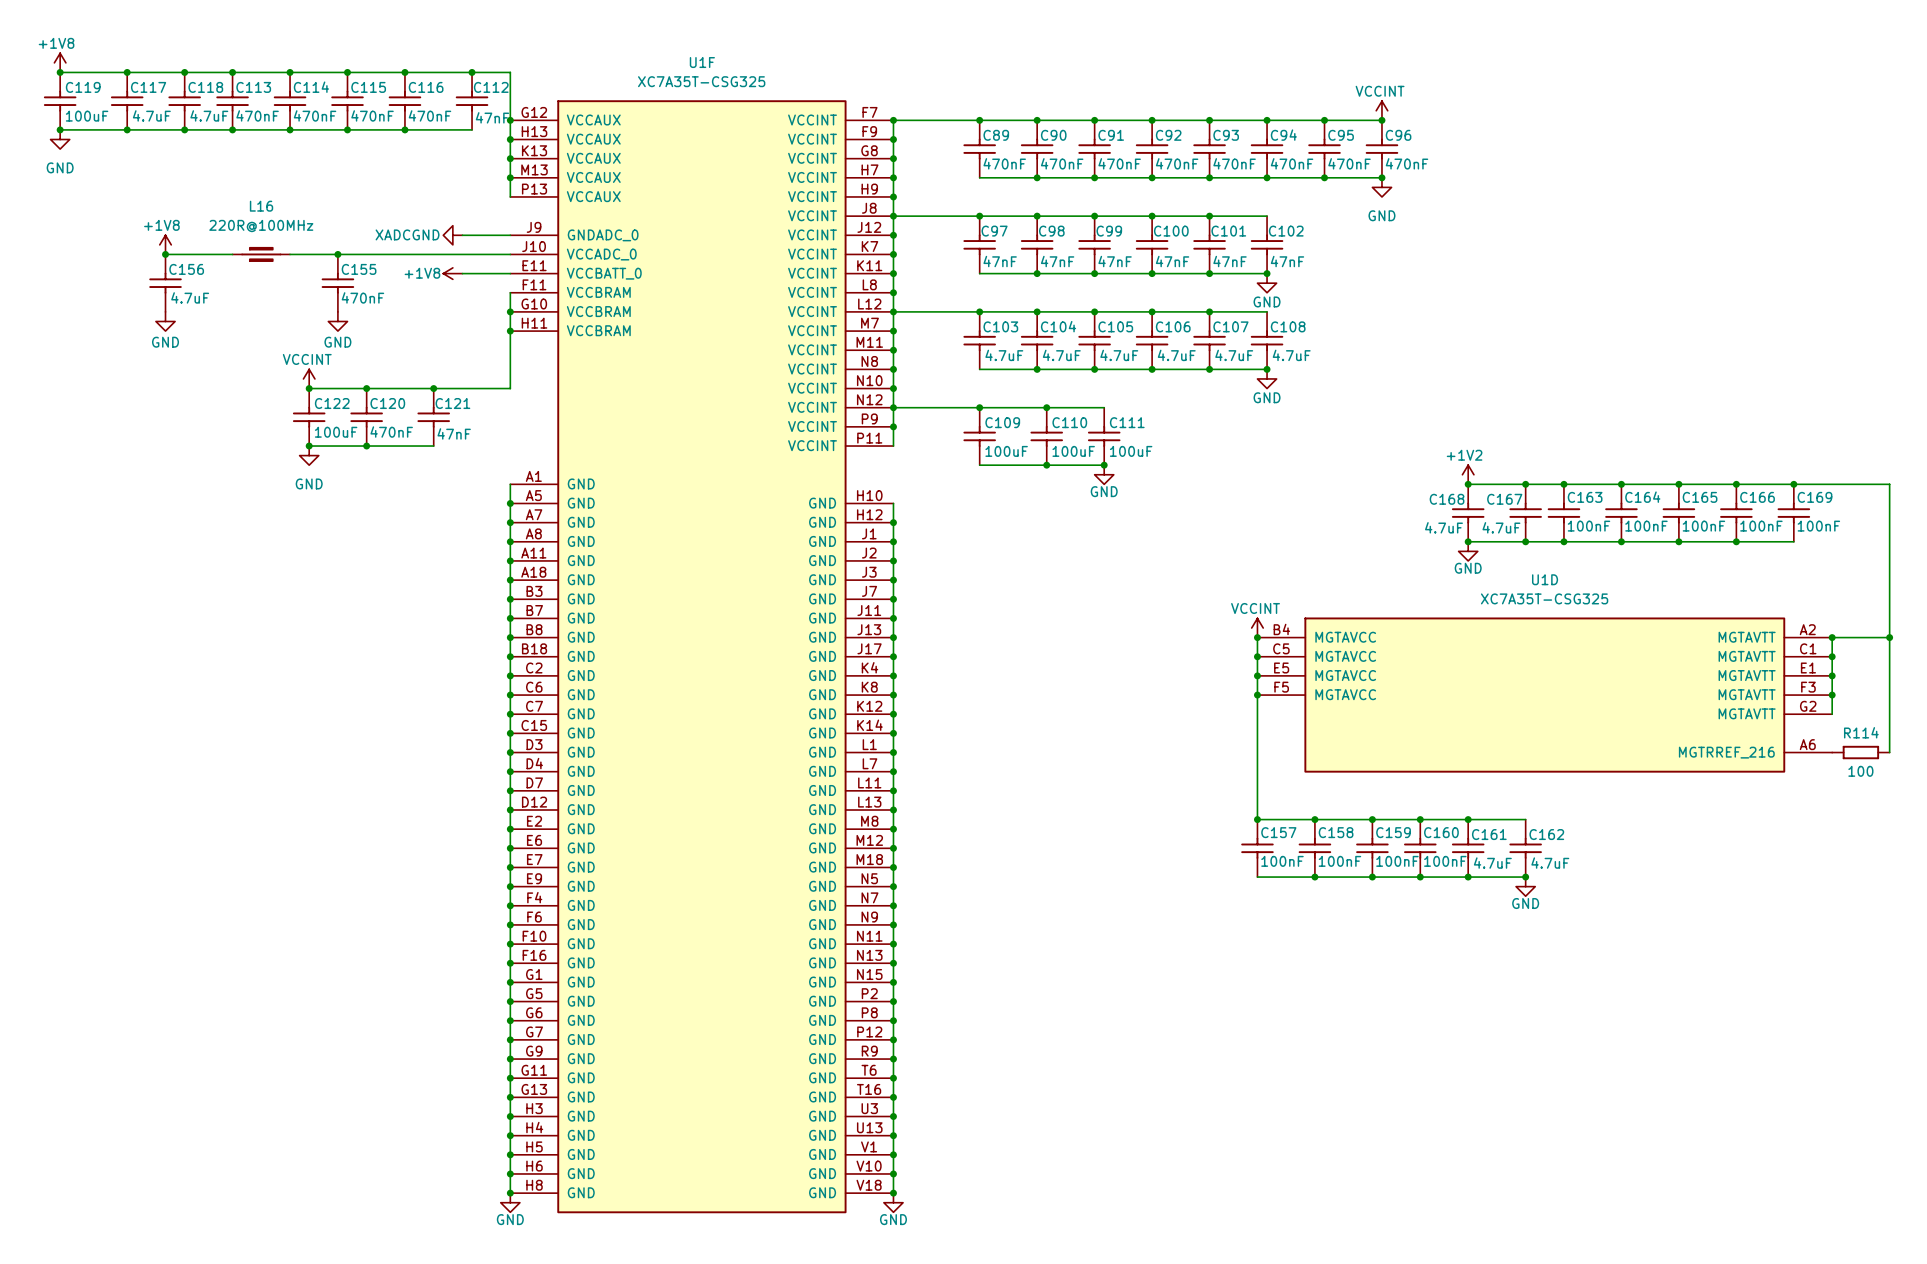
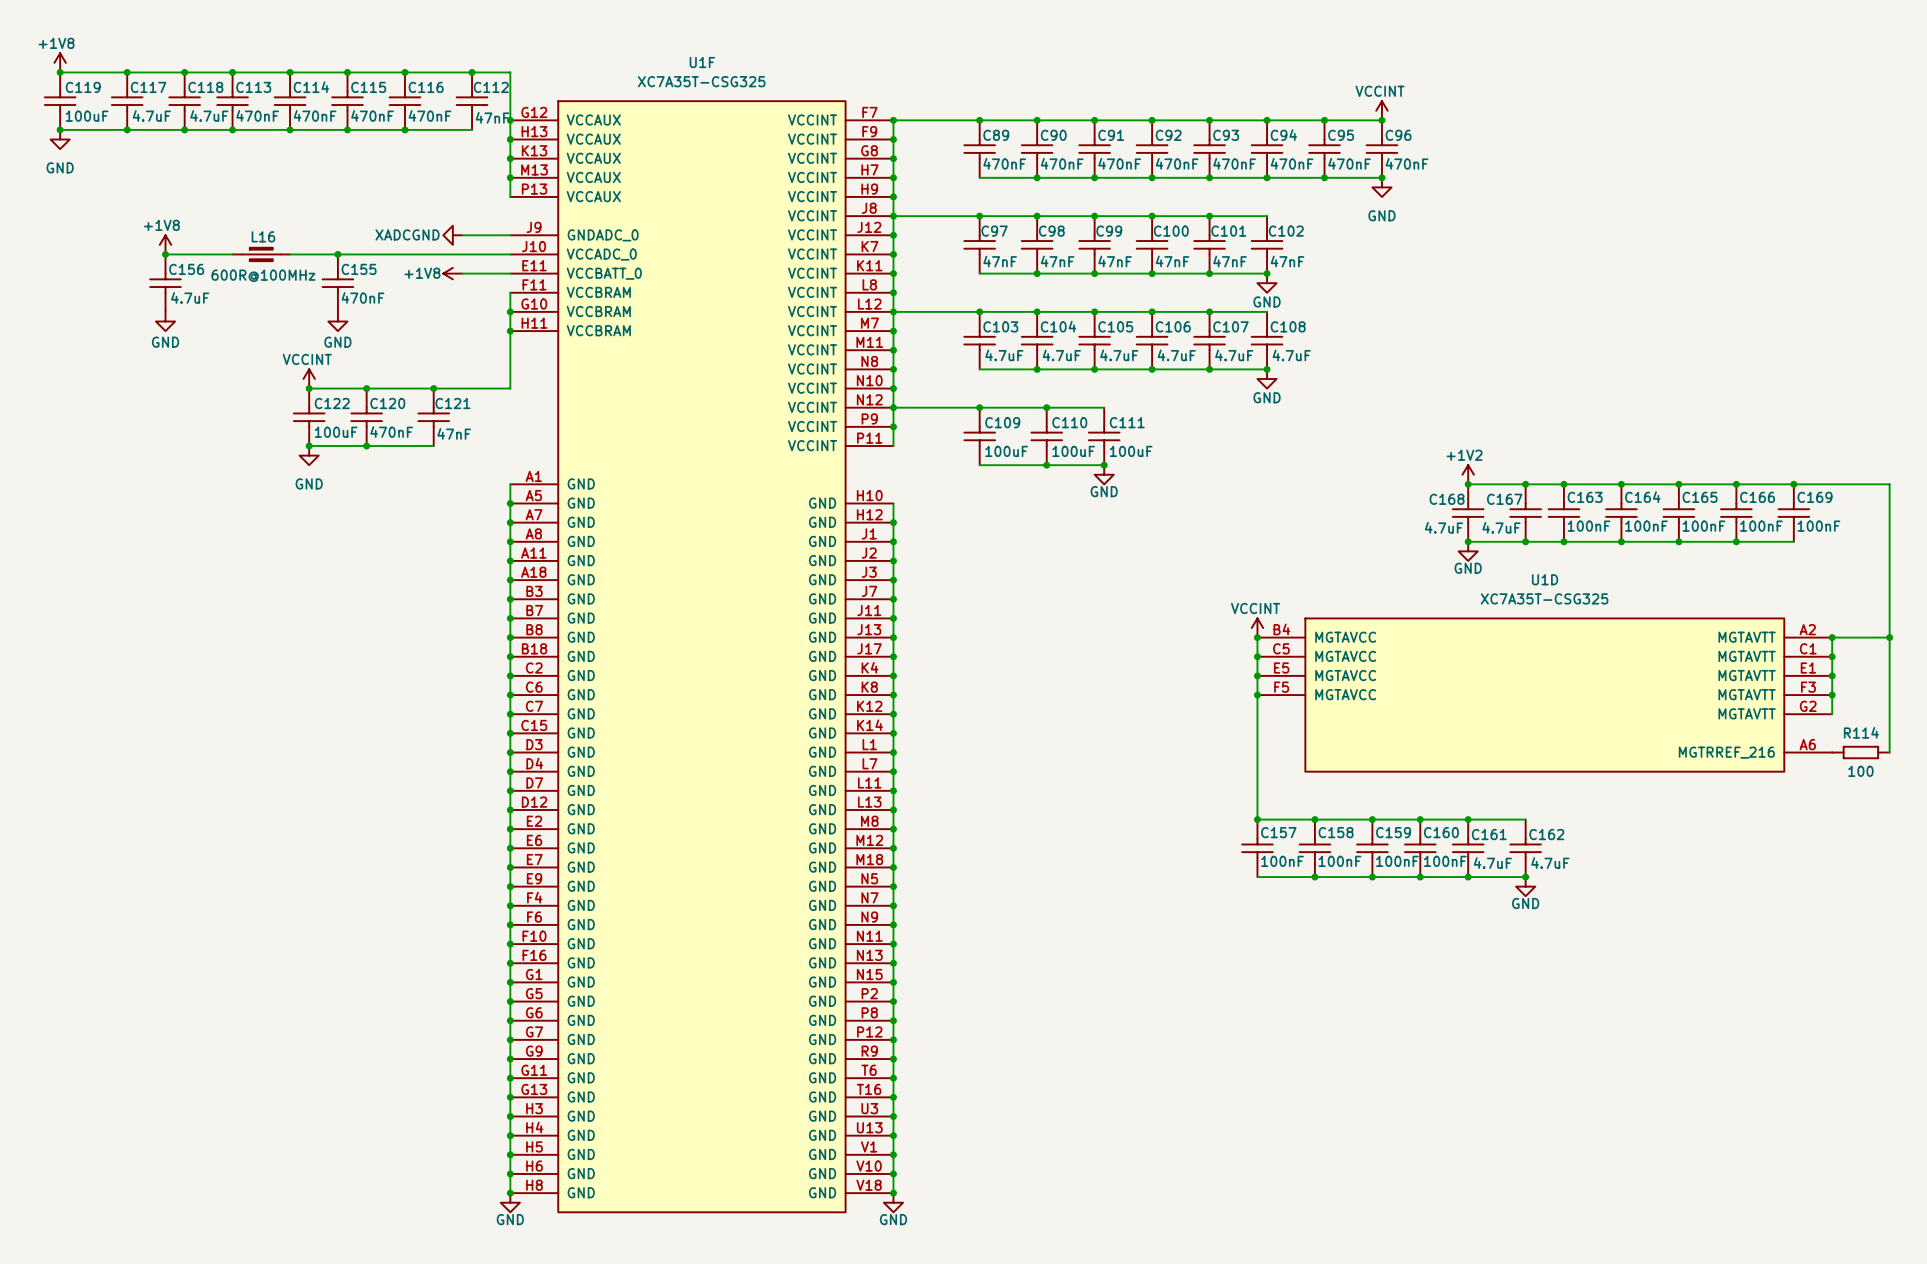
L16 name position: L16 (261, 206) -> L16 (263, 236)
L16 text: 220R@100MHz (261, 226) -> 600R@100MHz (263, 275)

